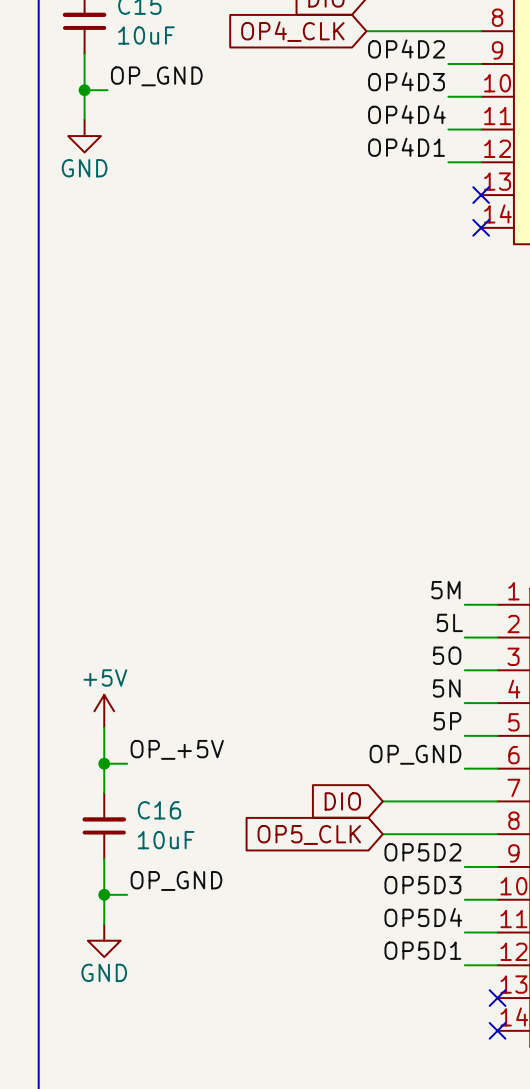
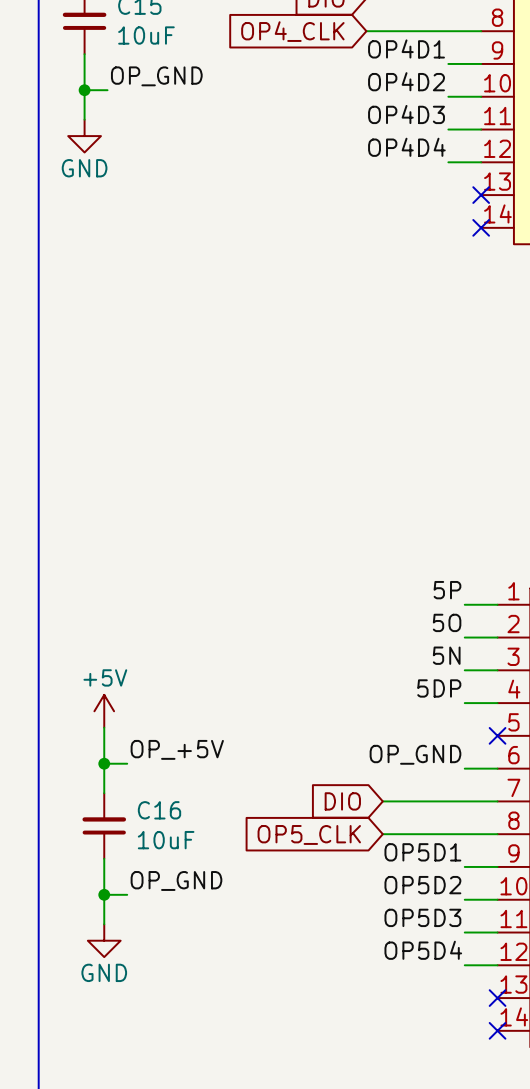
label: OP4D2 (406, 48) -> OP4D1 (406, 48)
label: OP4D3 (406, 81) -> OP4D2 (406, 81)
label: OP4D4 (406, 114) -> OP4D3 (406, 114)
label: OP4D1 (406, 147) -> OP4D4 (406, 147)
label: 5M (445, 590) -> 5P (447, 590)
label: 5L (449, 622) -> 5O (447, 622)
label: 5O (447, 655) -> 5N (446, 655)
label: 5N (446, 688) -> 5DP (439, 688)
label: 5P (447, 721) -> none
wire: (464, 735) (497, 735) -> none
no-connect mark: none -> (497, 735)
label: OP5D2 (422, 852) -> OP5D1 (422, 852)
label: OP5D3 (422, 885) -> OP5D2 (422, 885)
label: OP5D4 (423, 917) -> OP5D3 (422, 917)
label: OP5D1 (422, 950) -> OP5D4 (423, 950)

